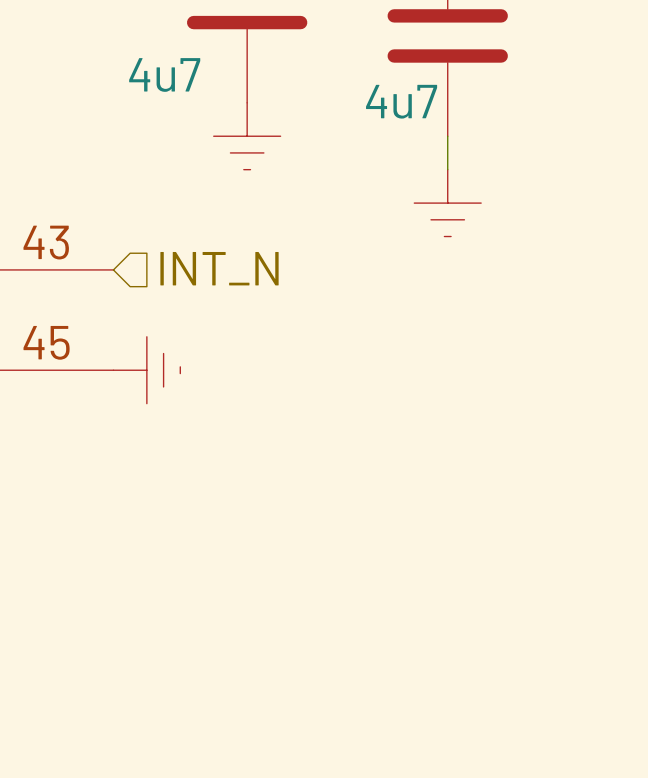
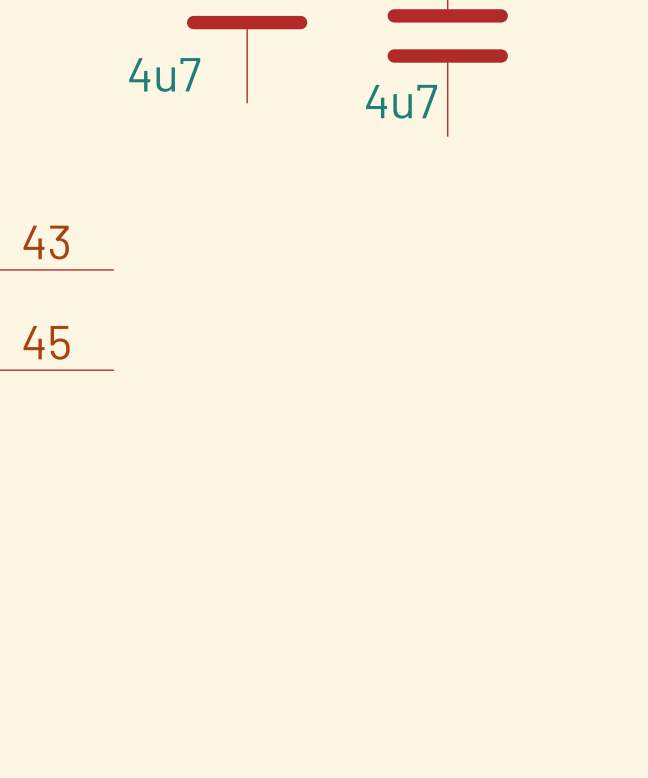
power symbol: (247, 136) -> none
wire: (447, 136) (447, 169) -> none
power symbol: (447, 203) -> none
hierarchical label: INT_N (219, 268) -> none
power symbol: (146, 370) -> none

